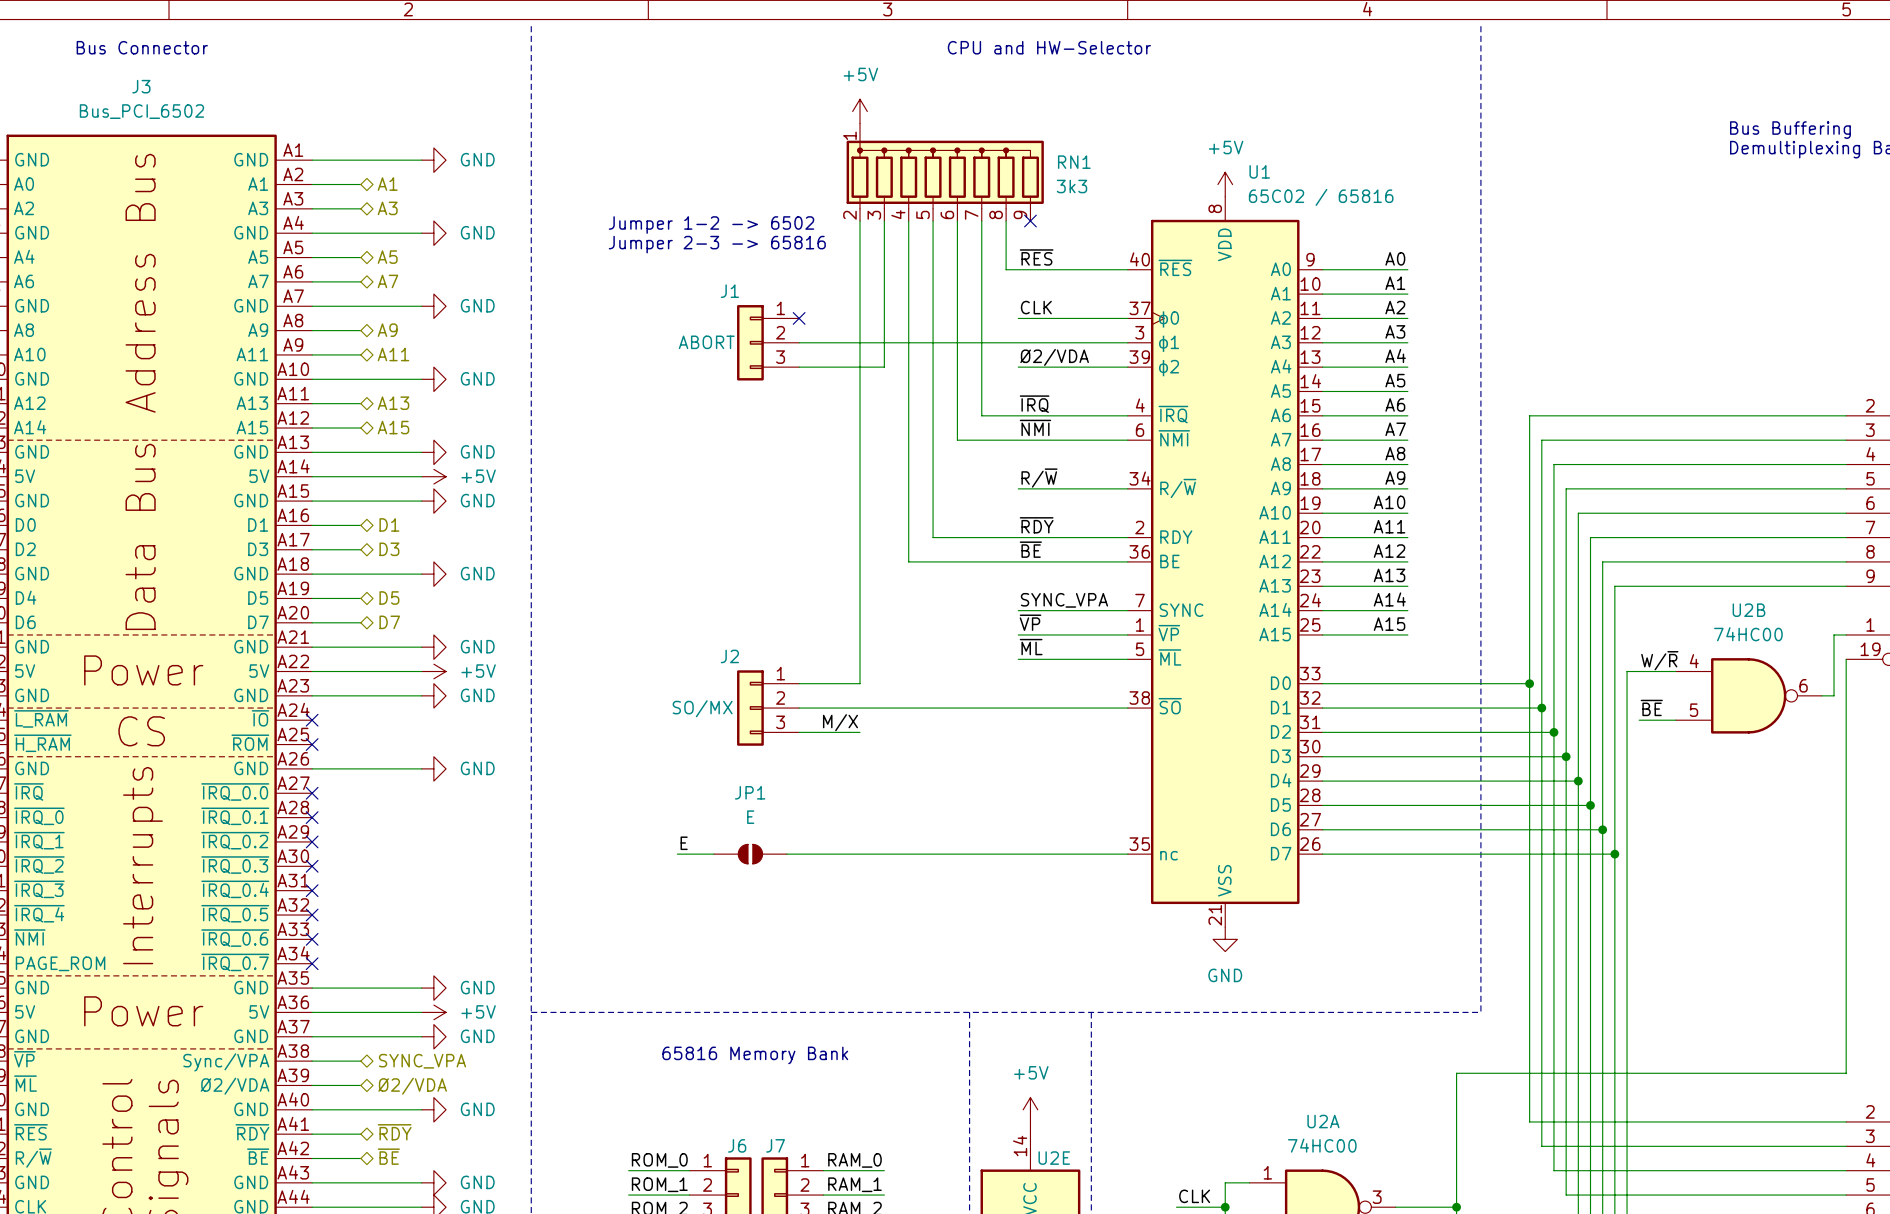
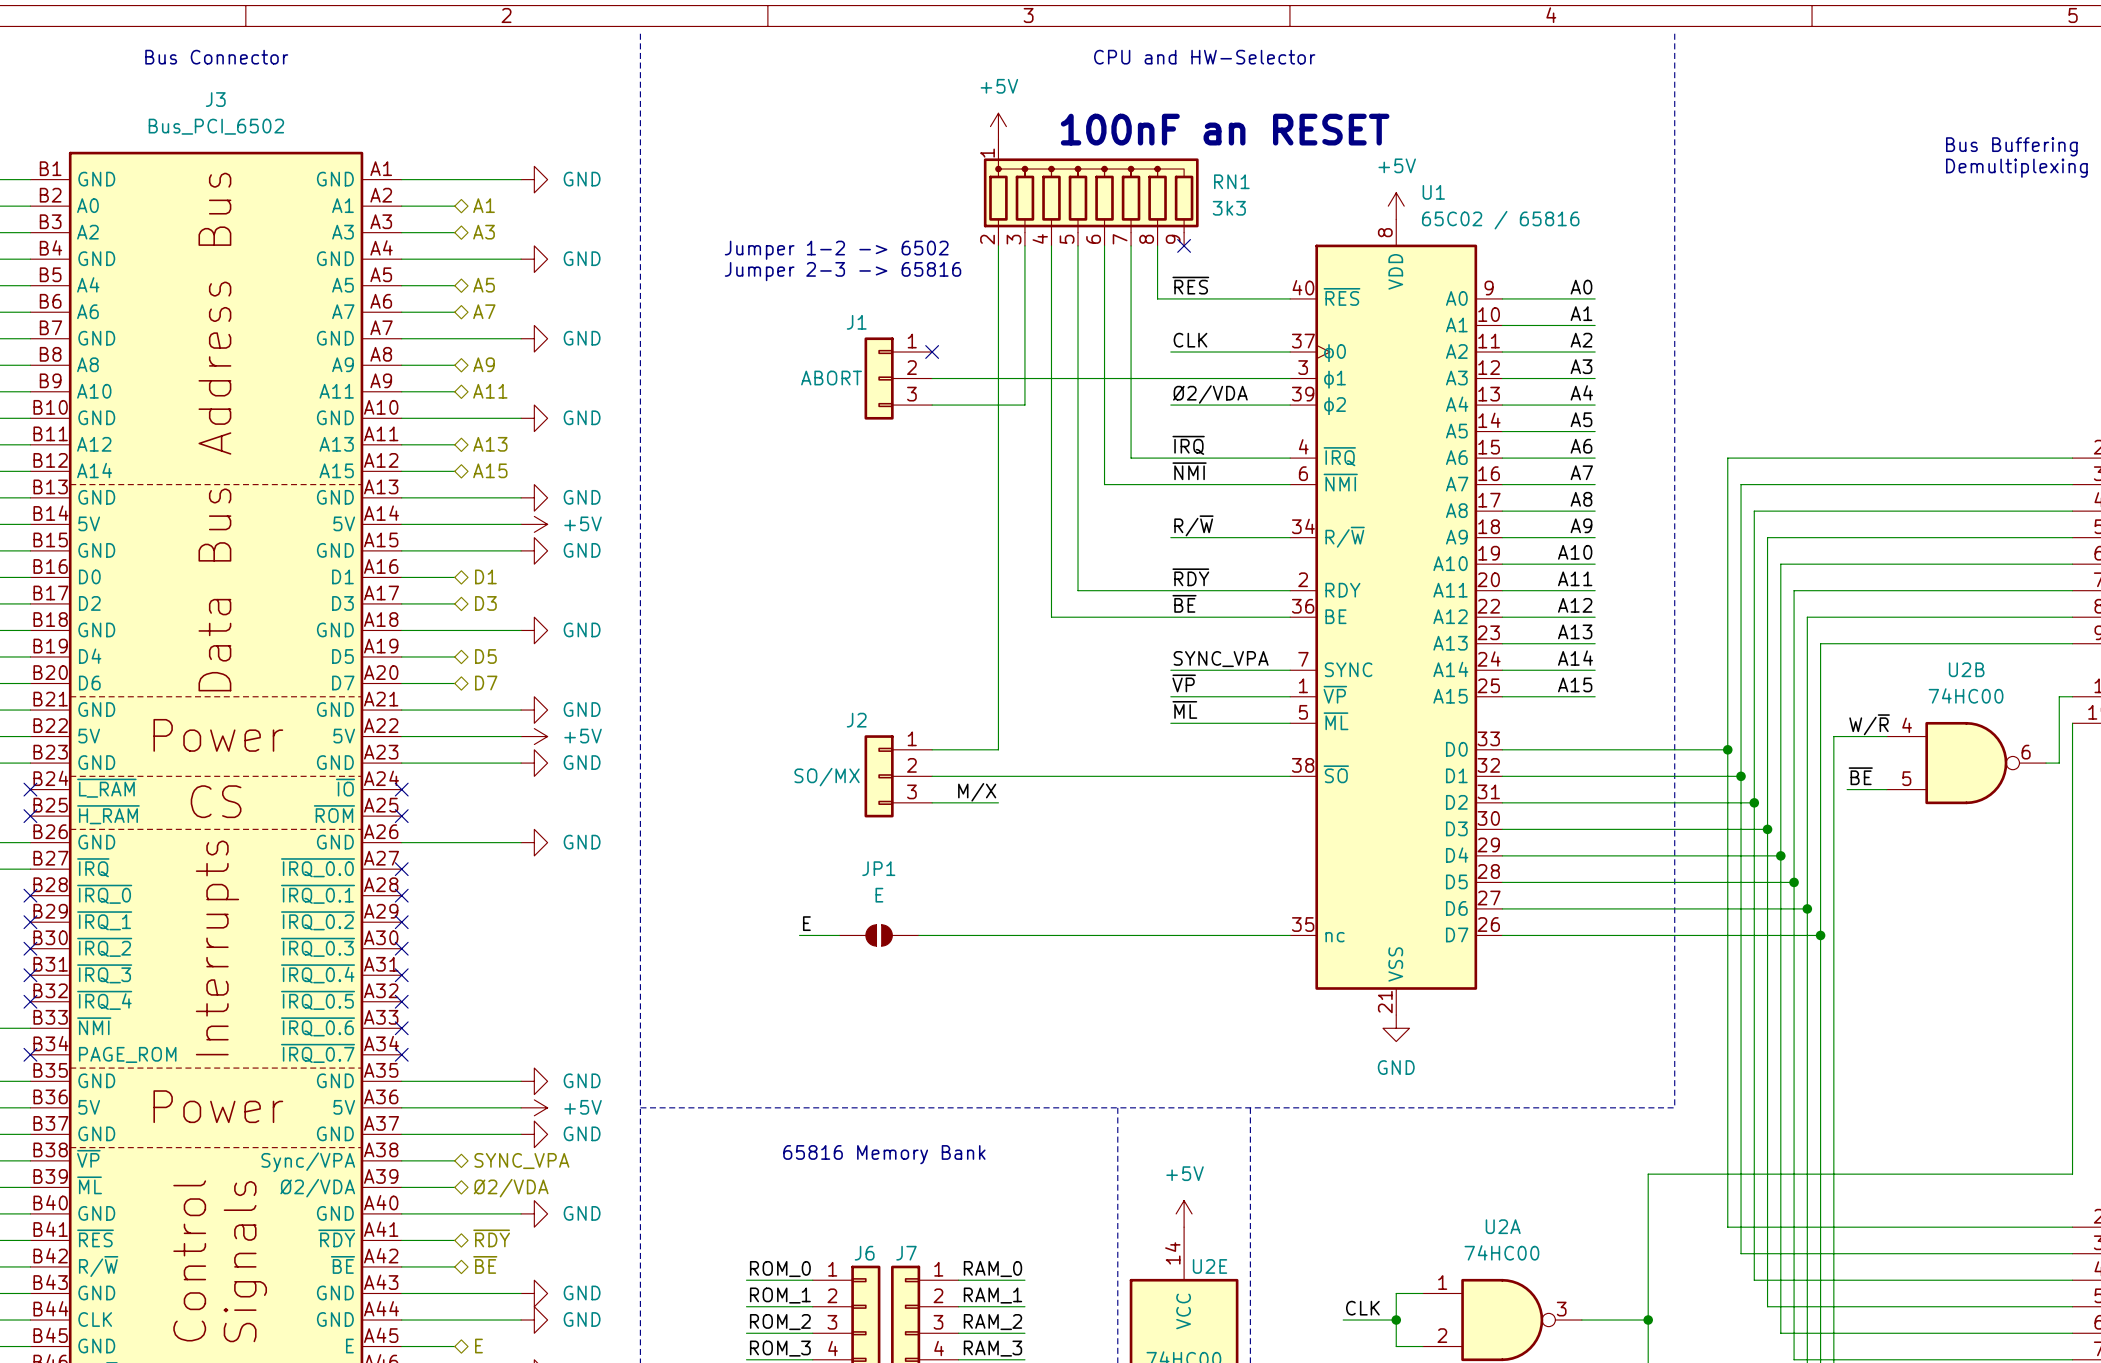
text: none -> 100nF an RESET (1225, 129)

